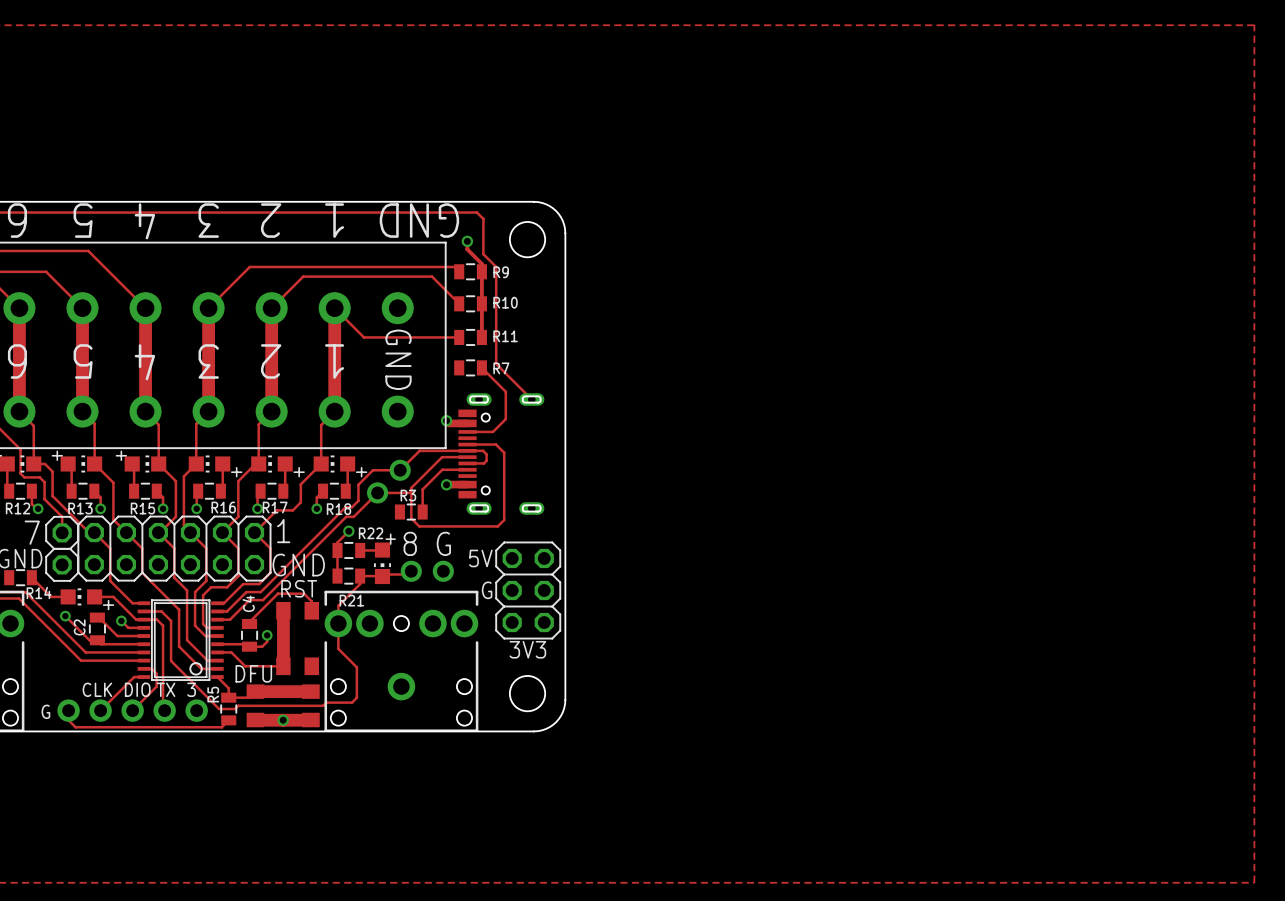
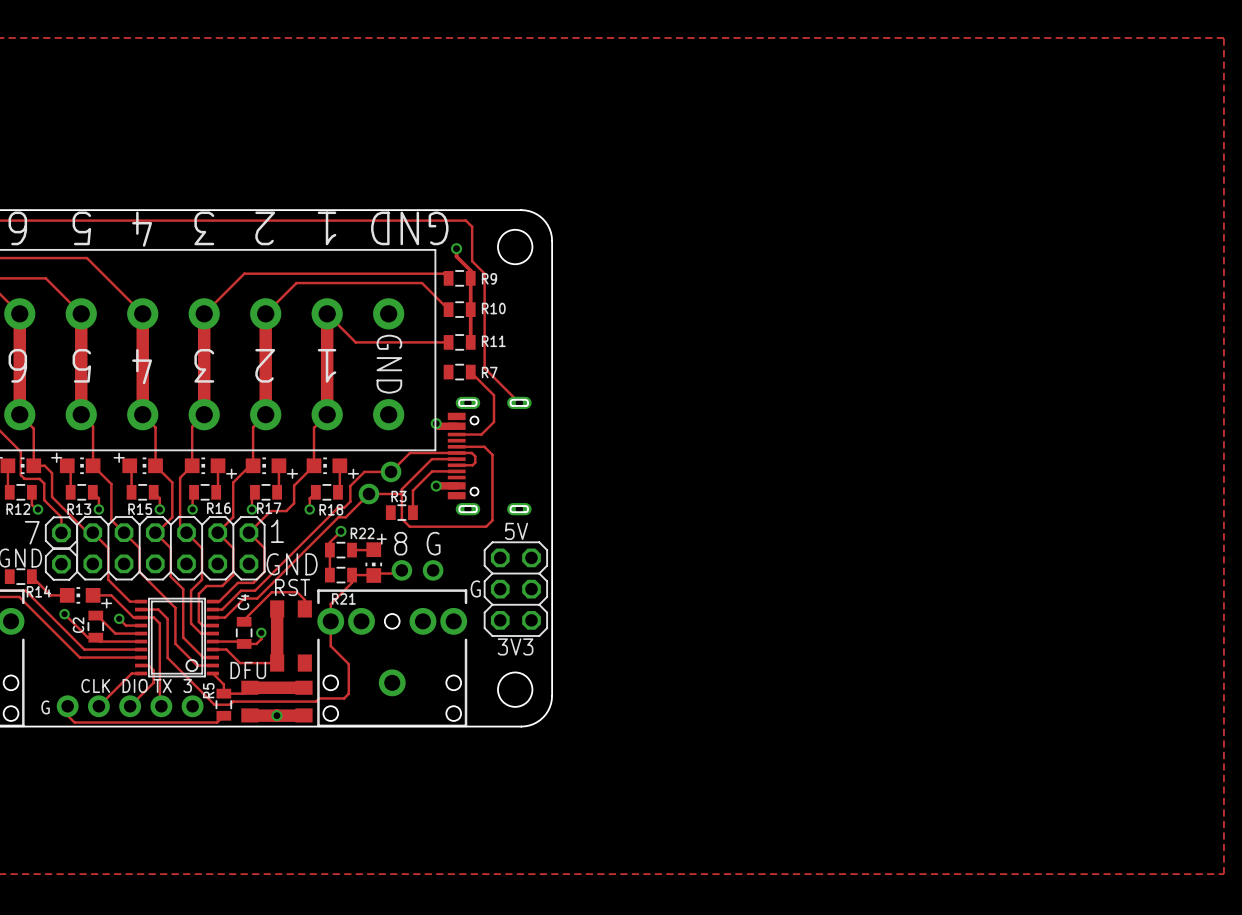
text position: 5V (480, 558) -> 5V (516, 531)

